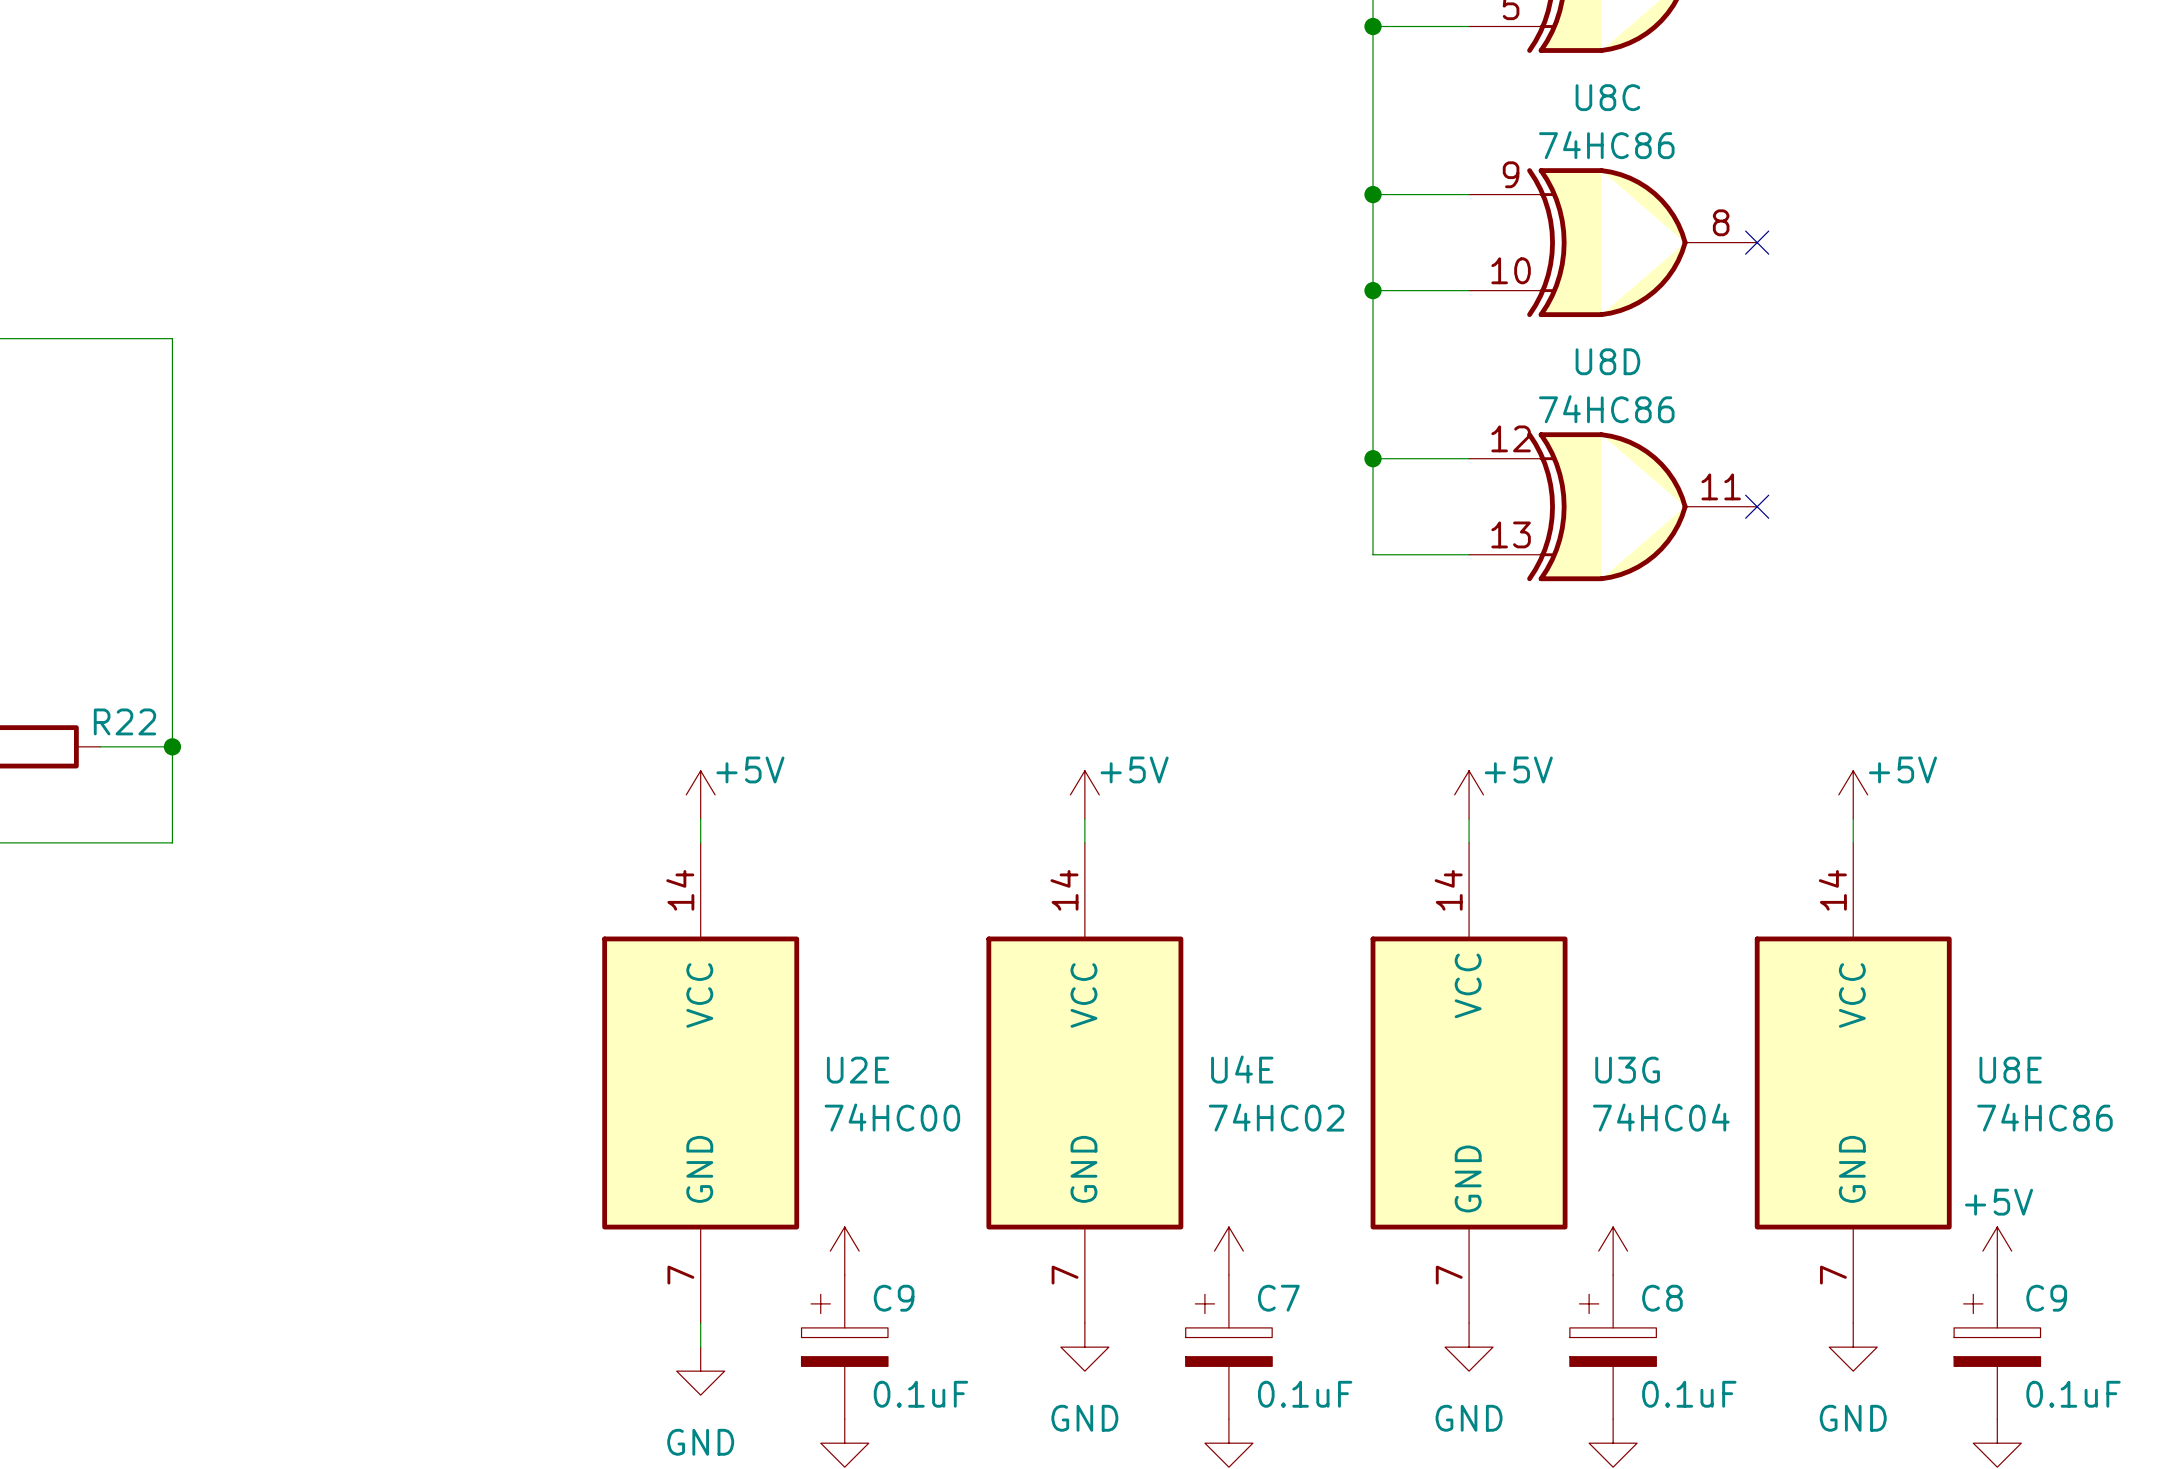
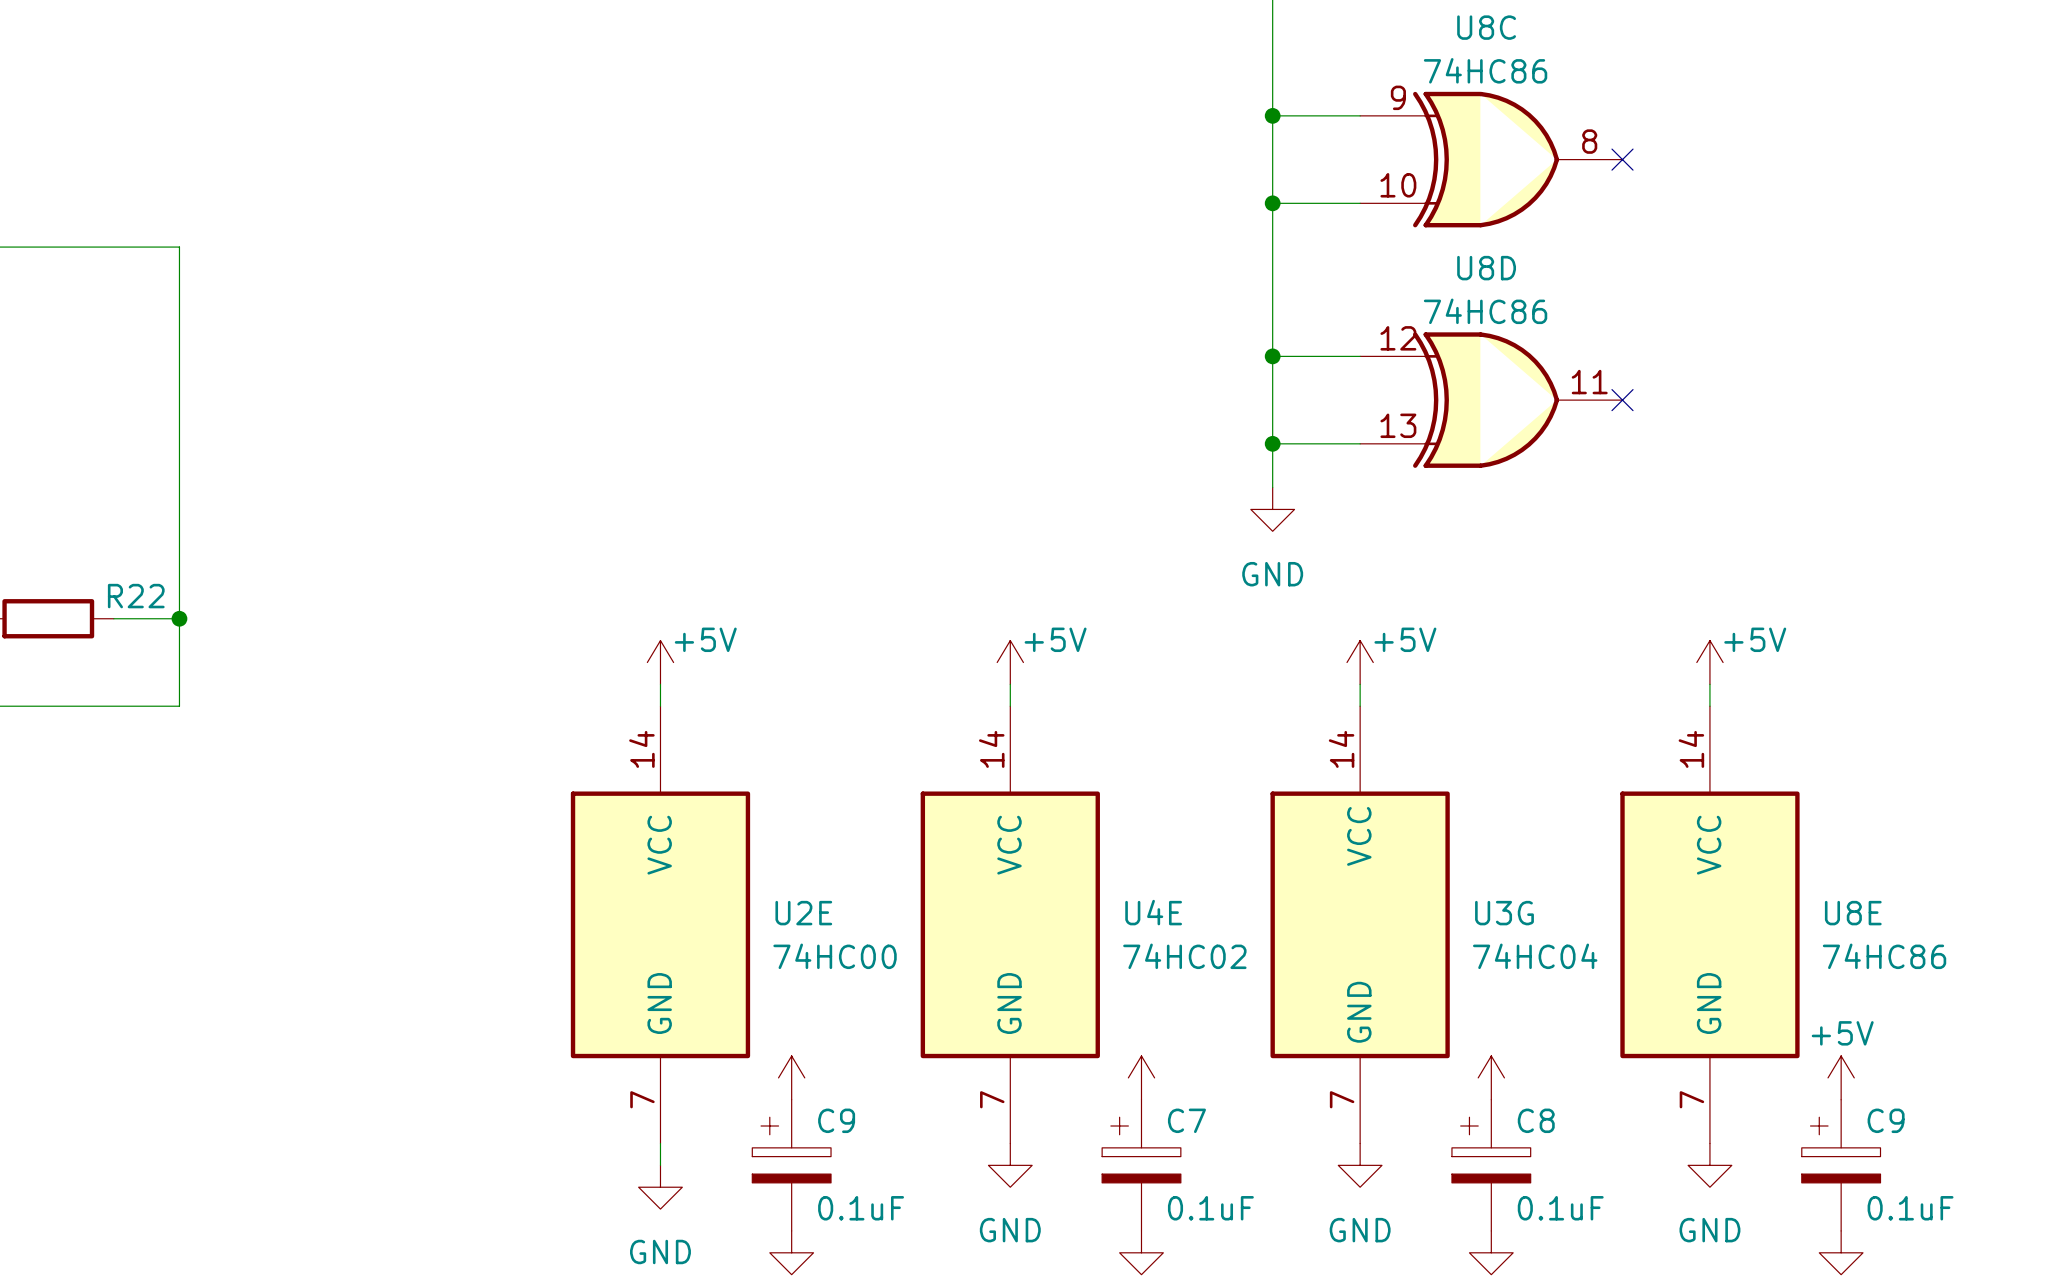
wire: none -> (1272, 443) (1272, 487)
junction: none -> (1272, 443)
power symbol: none -> GND (1272, 509)

